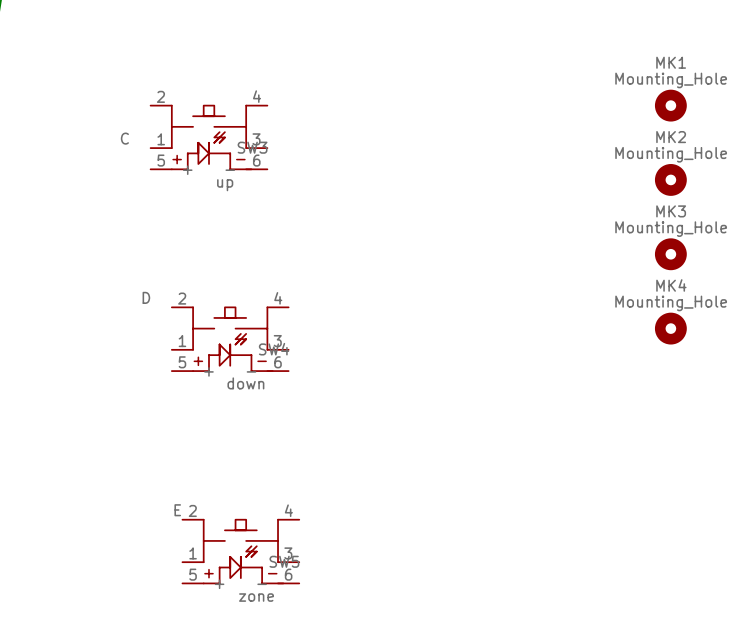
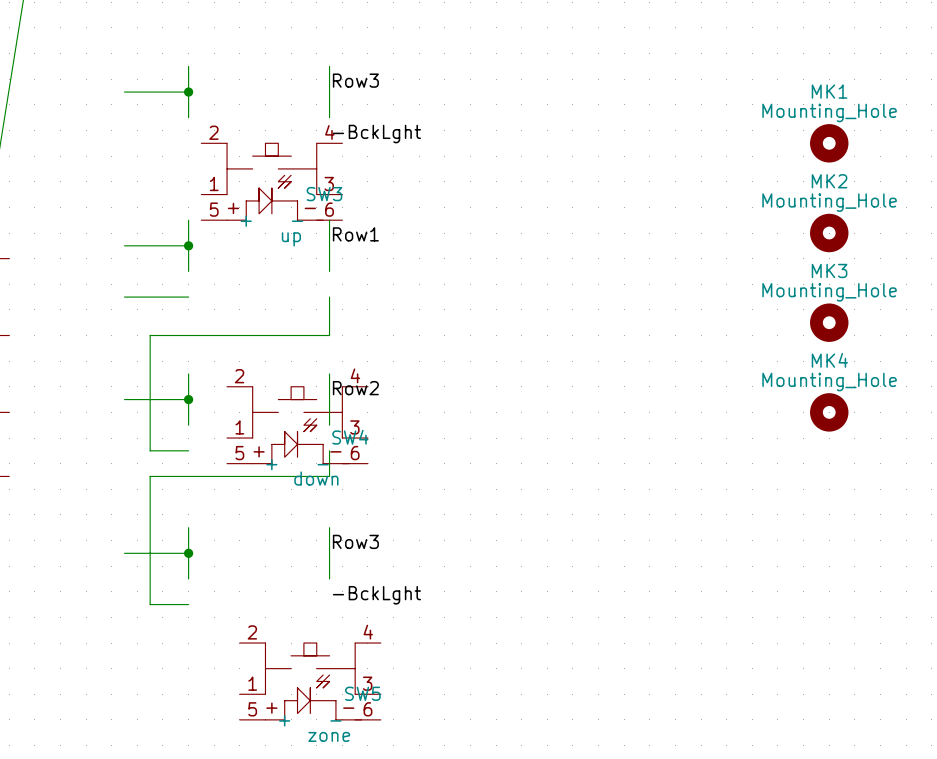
wire: none -> (188, 66) (188, 117)
wire: none -> (329, 66) (329, 117)
label: none -> Row3 (355, 80)
wire: none -> (124, 92) (188, 92)
junction: none -> (188, 92)
label: none -> -BckLght (376, 134)
label: C (124, 138) -> none
wire: none -> (188, 220) (188, 271)
wire: none -> (329, 220) (329, 271)
label: none -> Row1 (355, 234)
wire: none -> (124, 245) (188, 245)
junction: none -> (188, 245)
wire: none -> (124, 297) (188, 297)
wire: none -> (329, 297) (329, 335) (150, 335) (150, 450) (188, 450)
wire: none -> (188, 373) (188, 425)
wire: none -> (329, 373) (329, 425)
label: D (146, 297) -> none
label: none -> Row2 (355, 388)
wire: none -> (124, 399) (188, 399)
junction: none -> (188, 399)
wire: none -> (329, 450) (329, 476) (150, 476) (150, 604) (188, 604)
wire: none -> (188, 527) (188, 578)
wire: none -> (329, 527) (329, 578)
label: none -> Row3 (355, 541)
wire: none -> (124, 553) (188, 553)
junction: none -> (188, 553)
label: none -> -BckLght (376, 595)
label: E (177, 510) -> none

